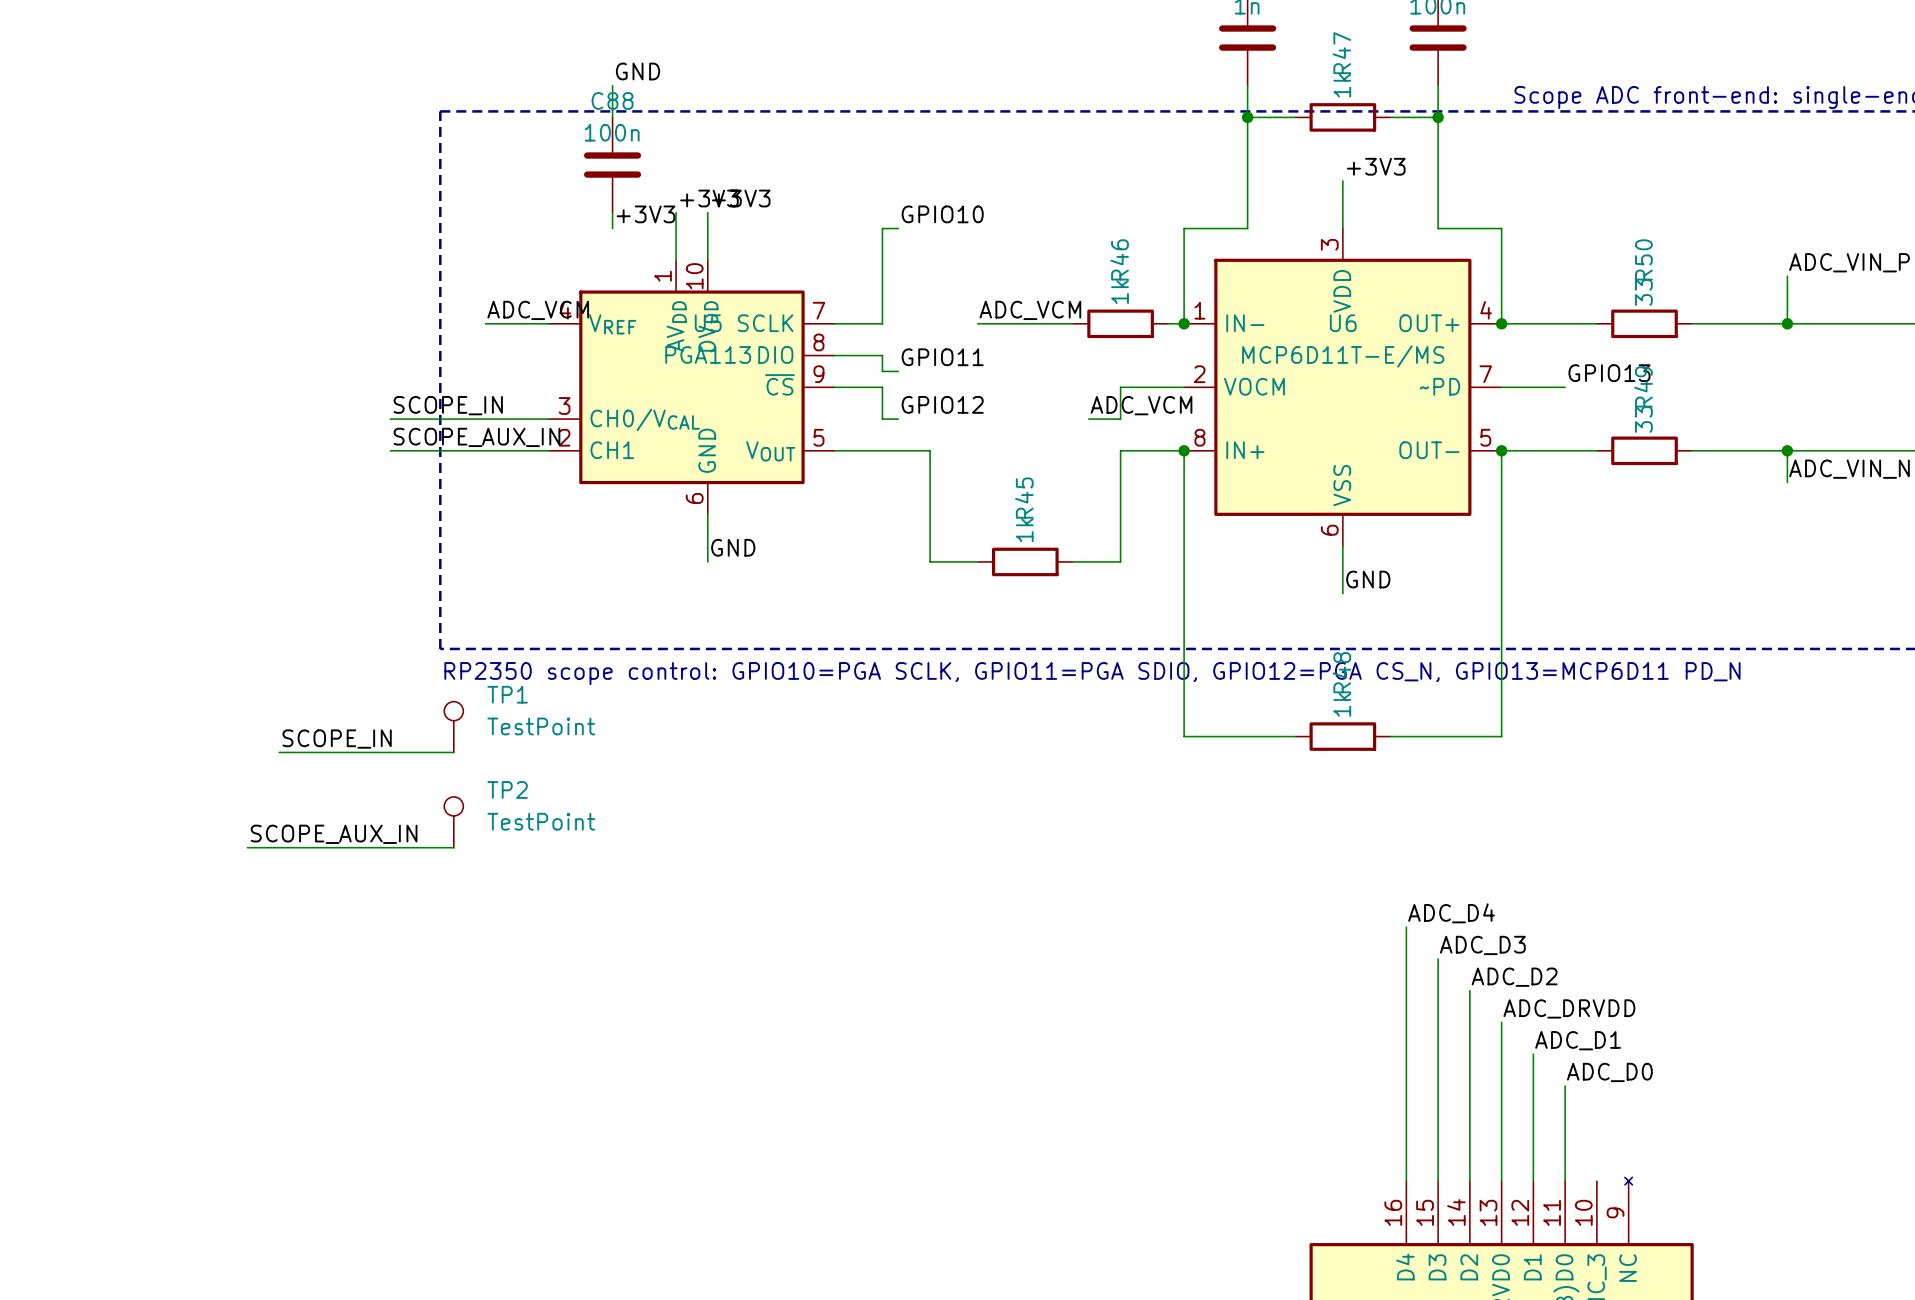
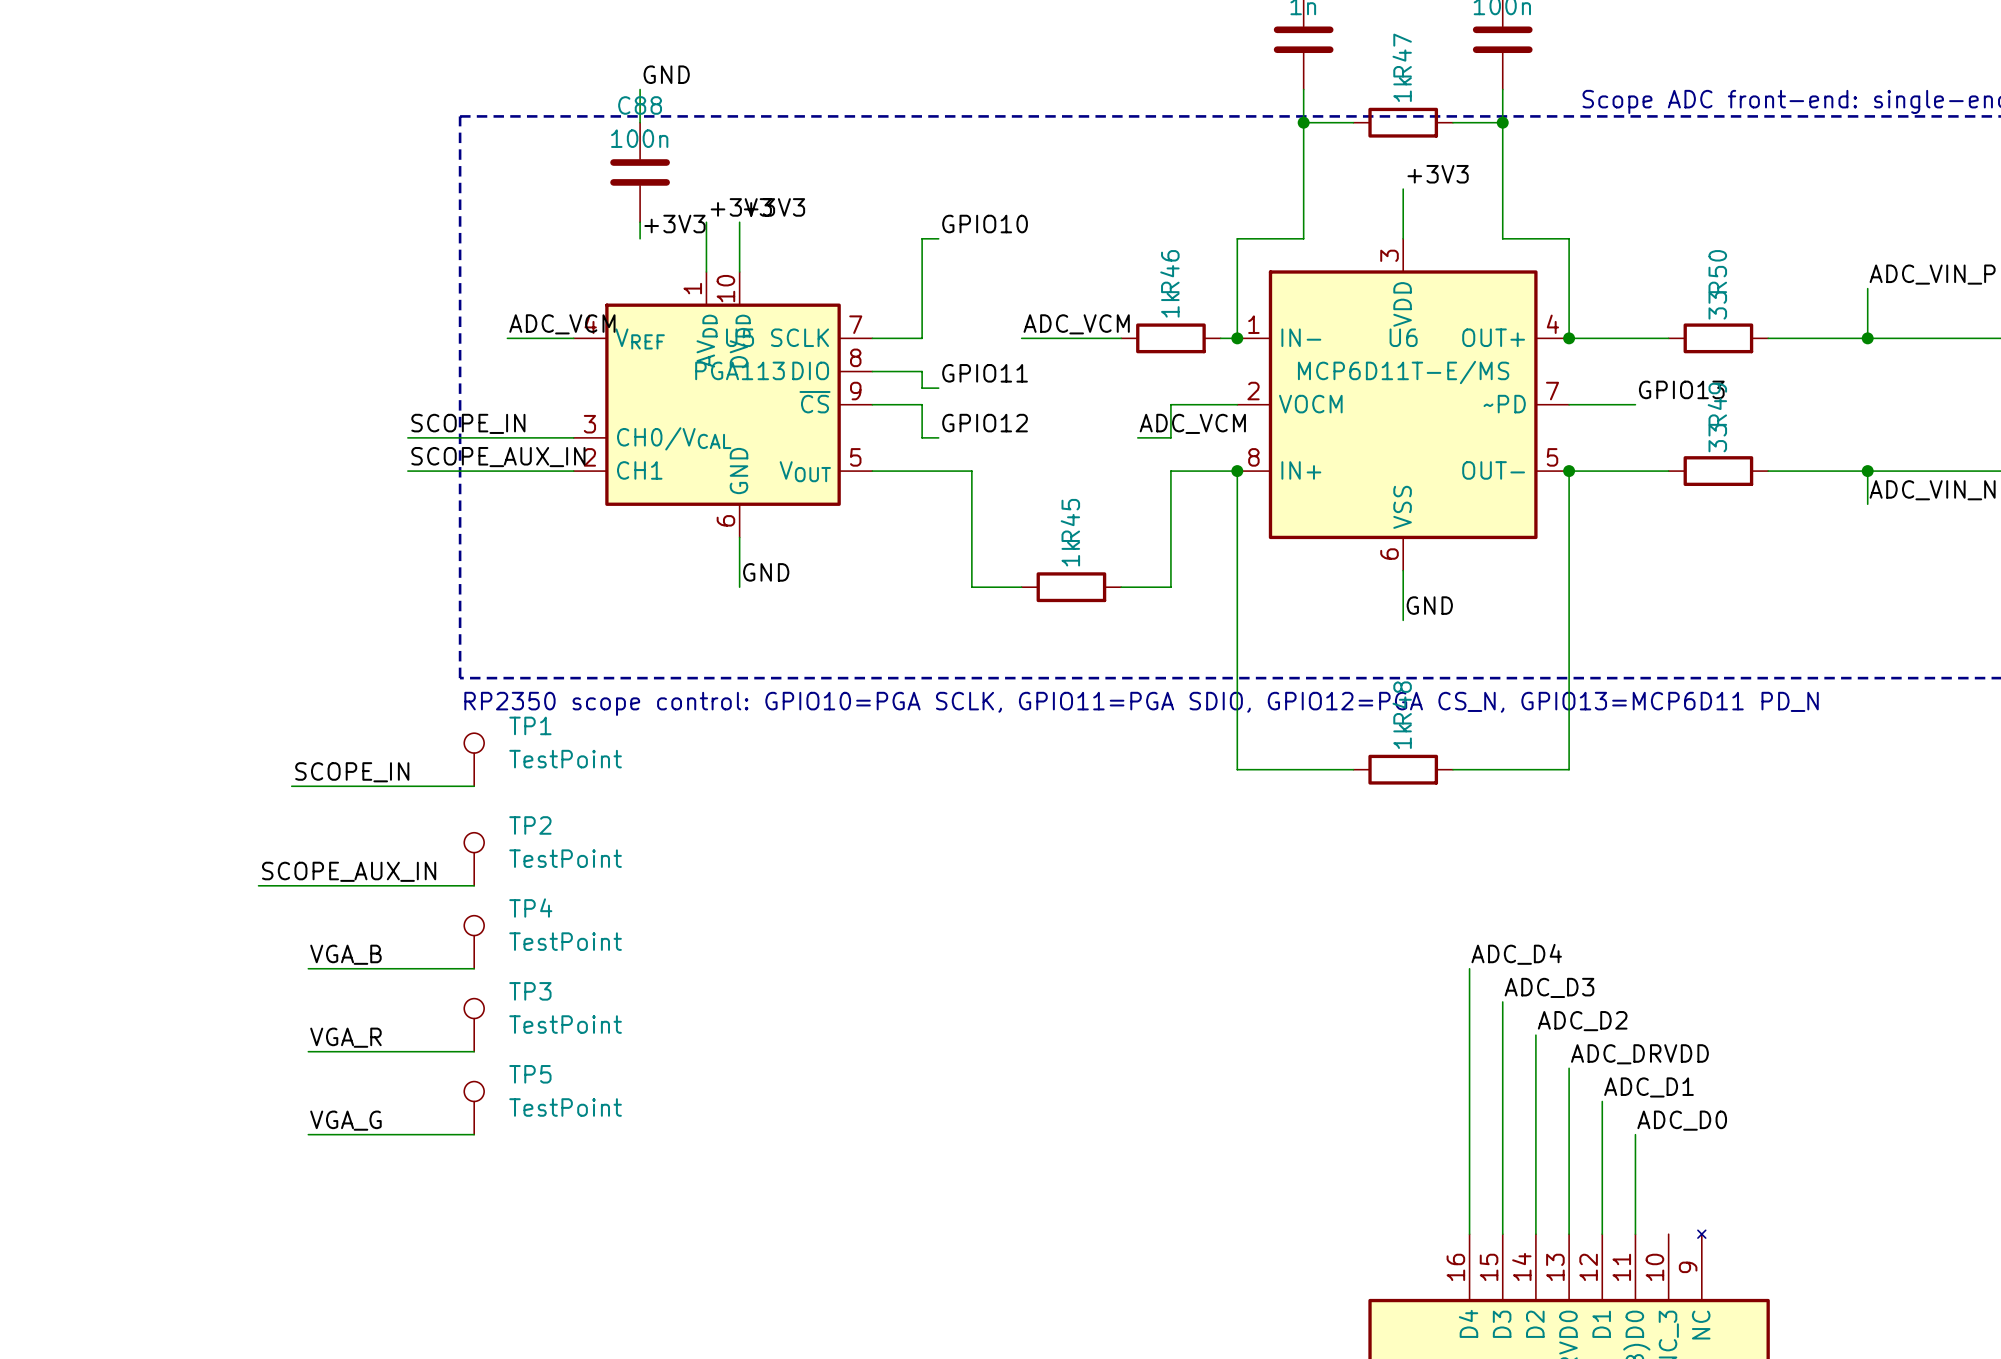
TP4: none -> TestPoint (474, 942)
label: none -> VGA_B (345, 954)
wire: none -> (308, 968) (474, 968)
TP3: none -> TestPoint (474, 1025)
label: none -> VGA_R (345, 1037)
wire: none -> (308, 1051) (474, 1051)
TP5: none -> TestPoint (474, 1108)
label: none -> VGA_G (345, 1120)
wire: none -> (308, 1134) (474, 1134)

